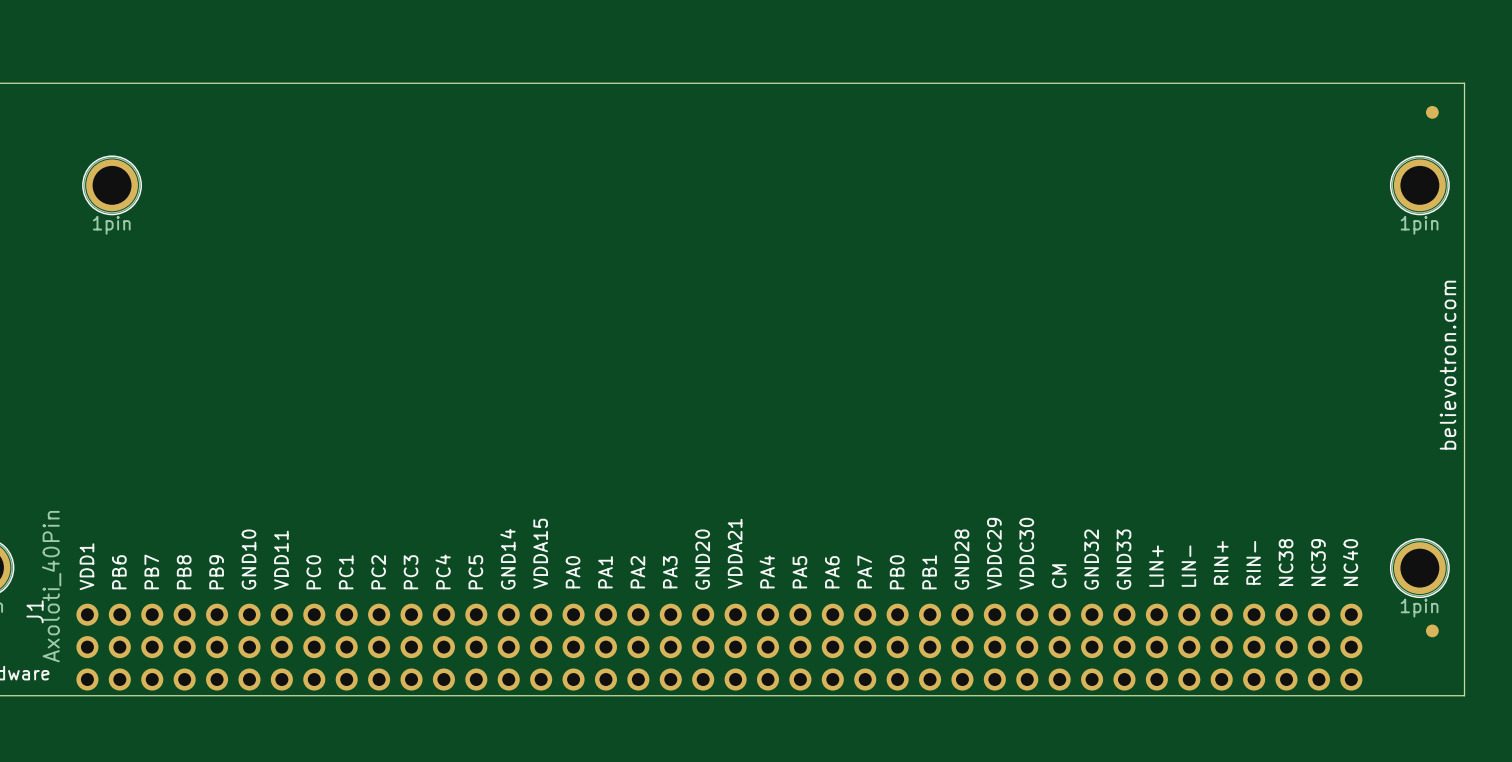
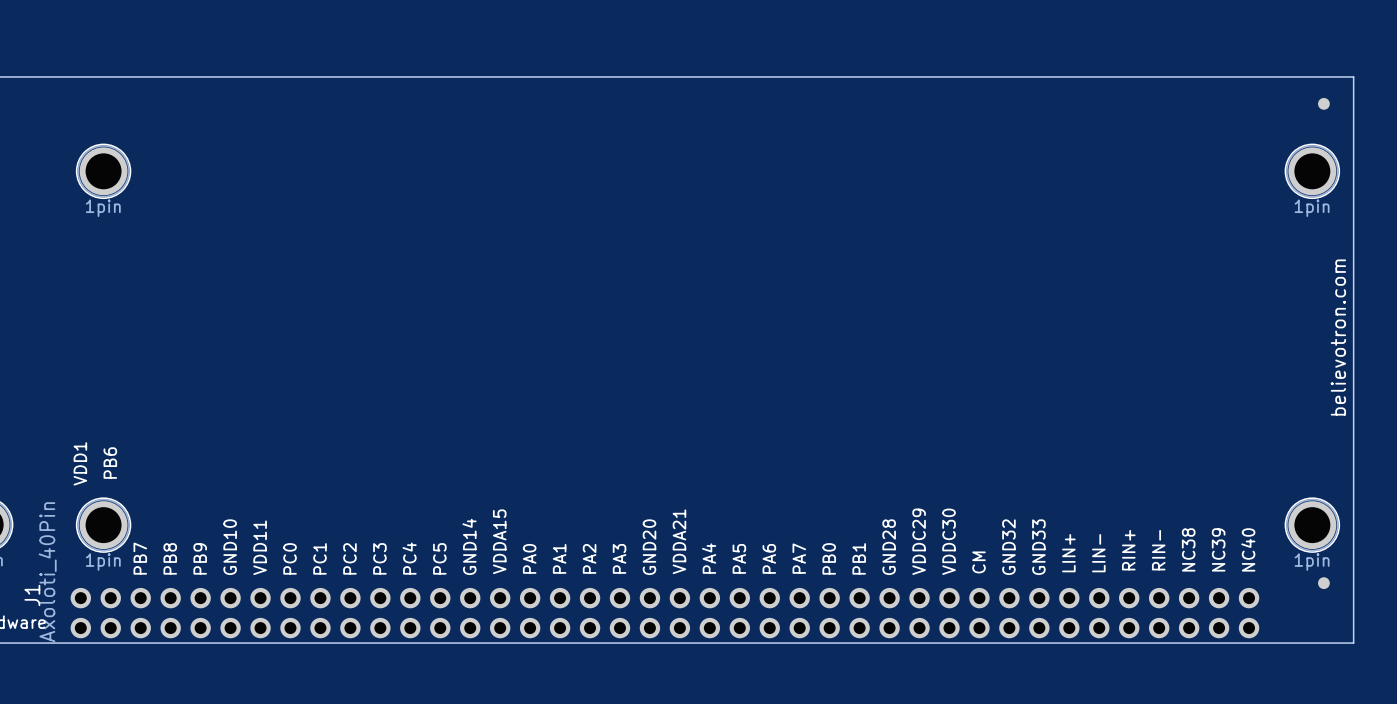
part: none -> 1pin (103, 525)
J1 footprint: [76, 603, 1363, 691] -> [70, 587, 1260, 639]

